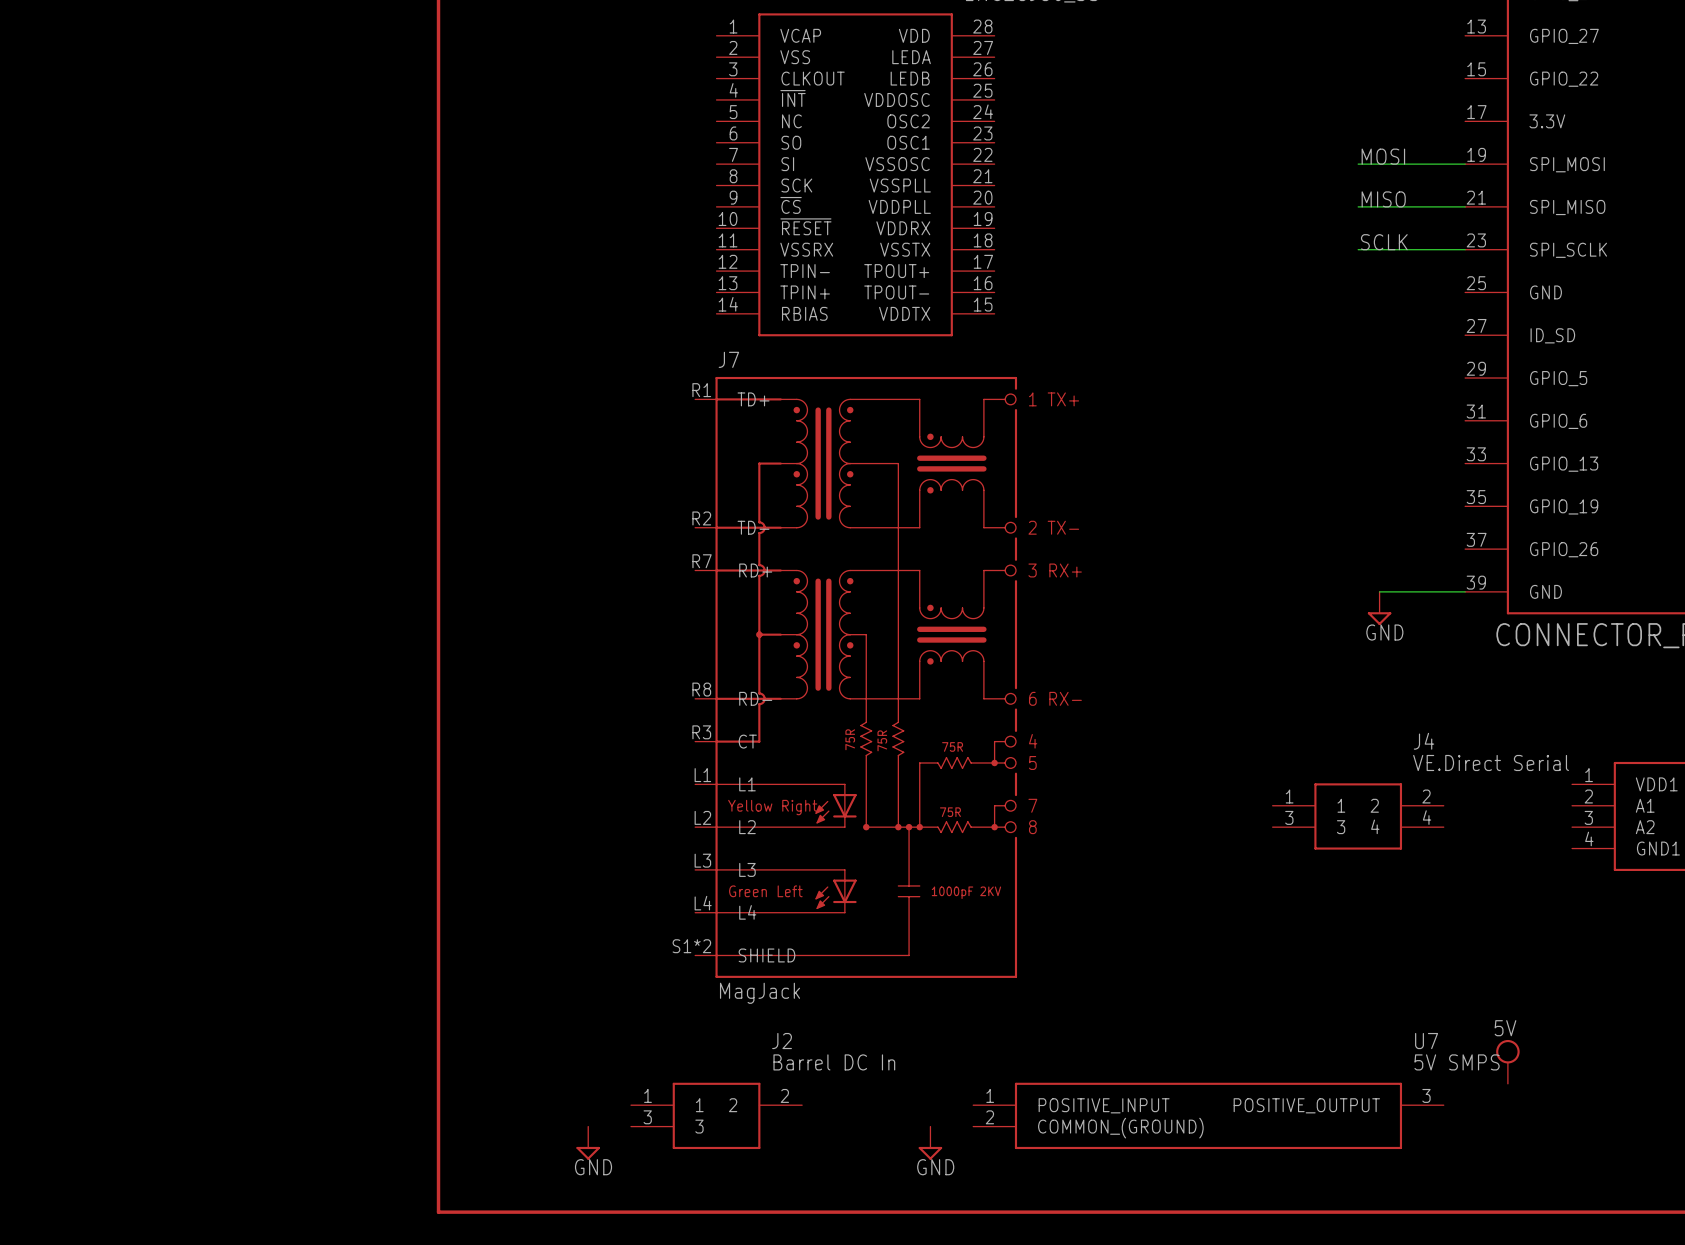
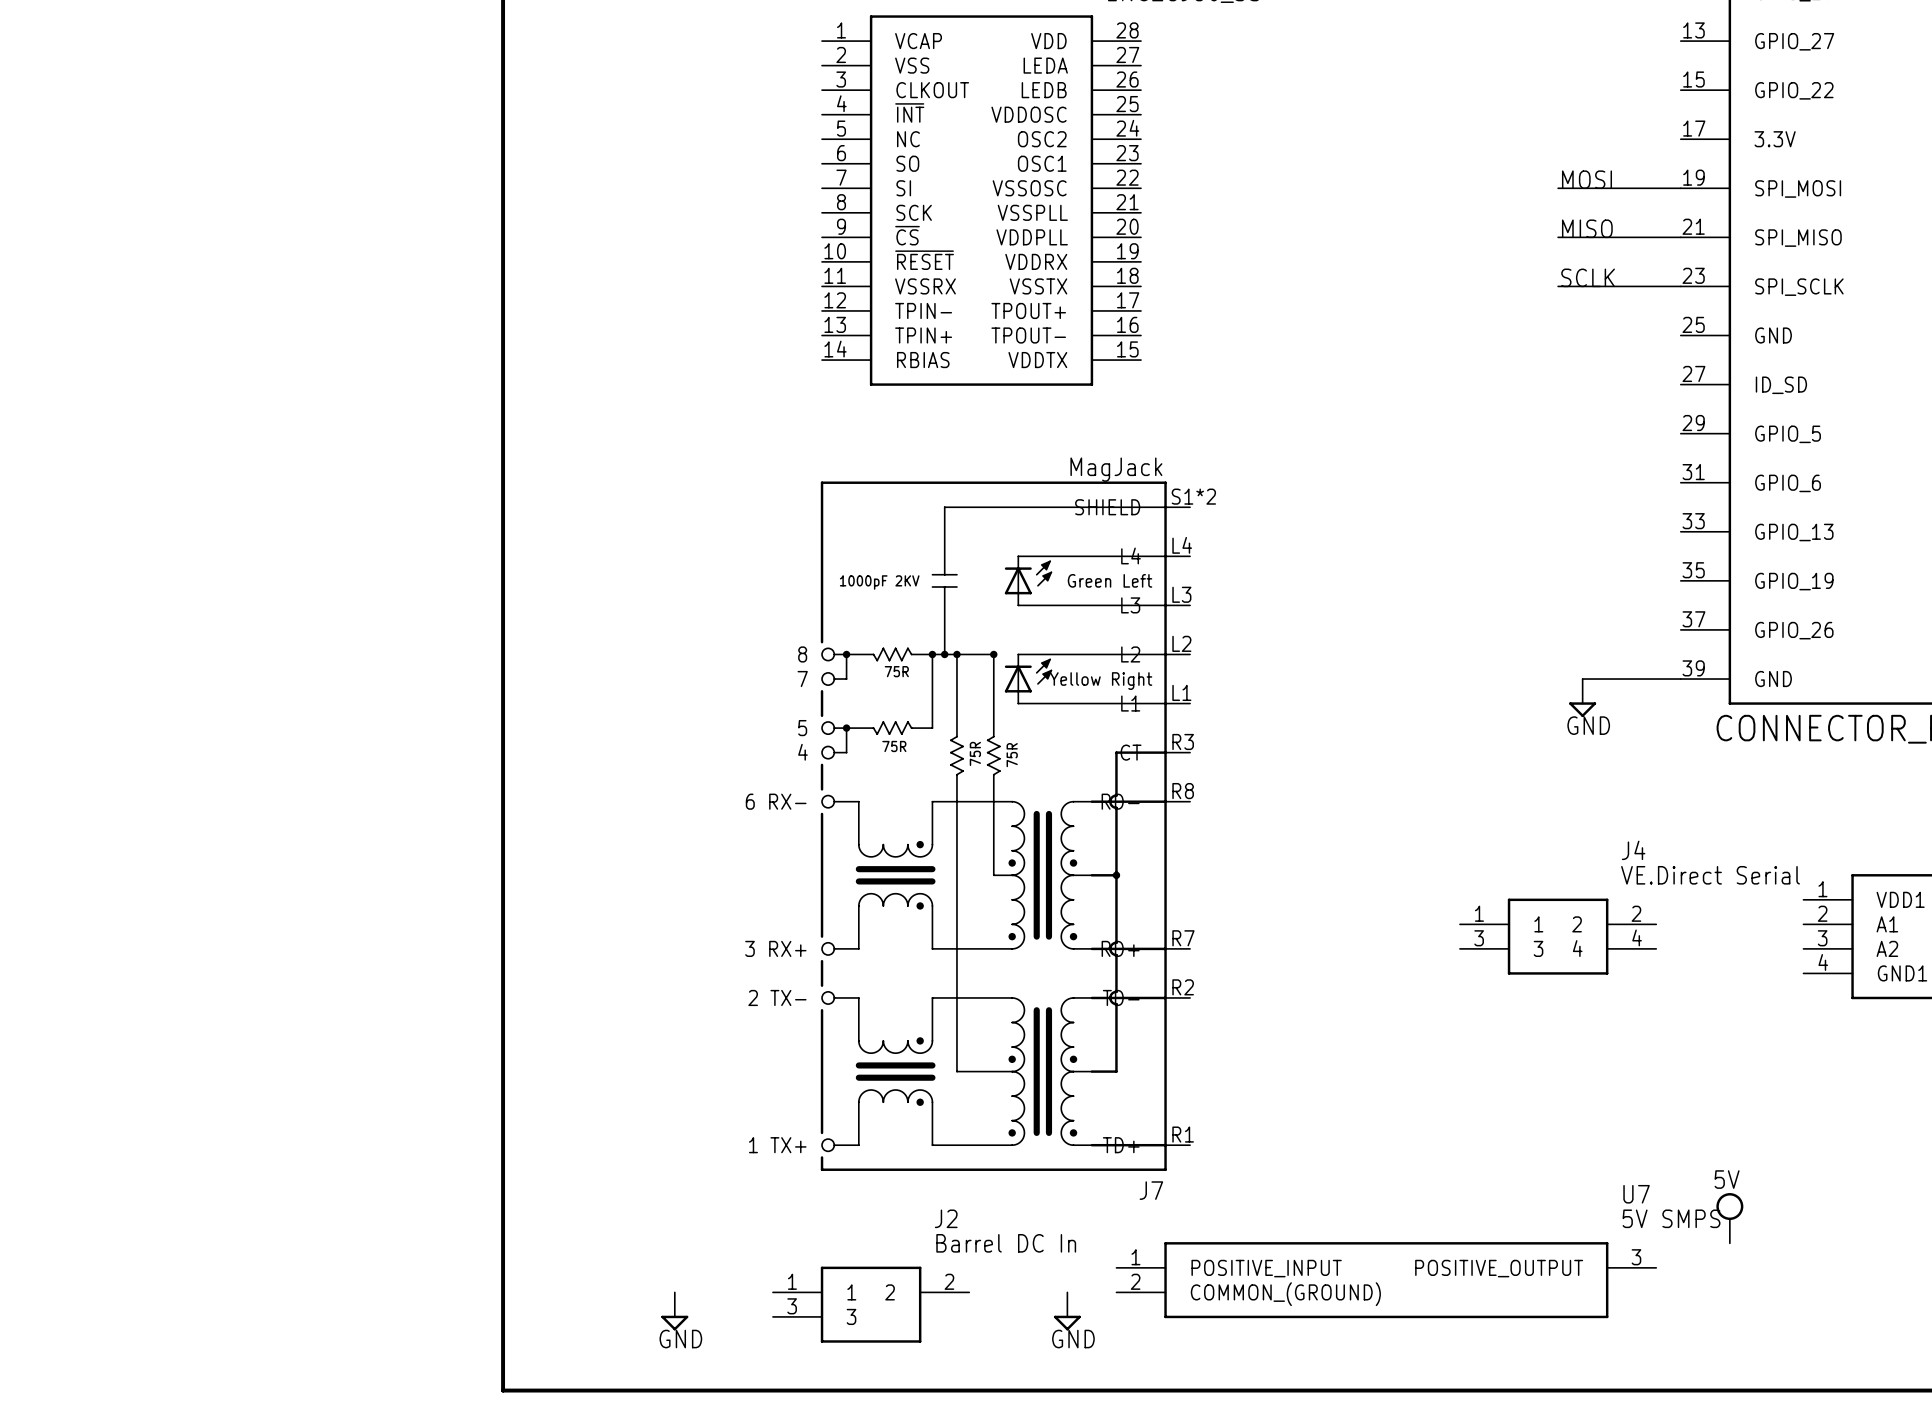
J7 name position: J7 (728, 359) -> J7 (1151, 1190)
J7 symbol: [695, 376, 1018, 978] -> [820, 481, 1191, 1171]
J7 value position: MagJack (760, 993) -> MagJack (1116, 469)
J2 position: (716, 1115) -> (871, 1304)

